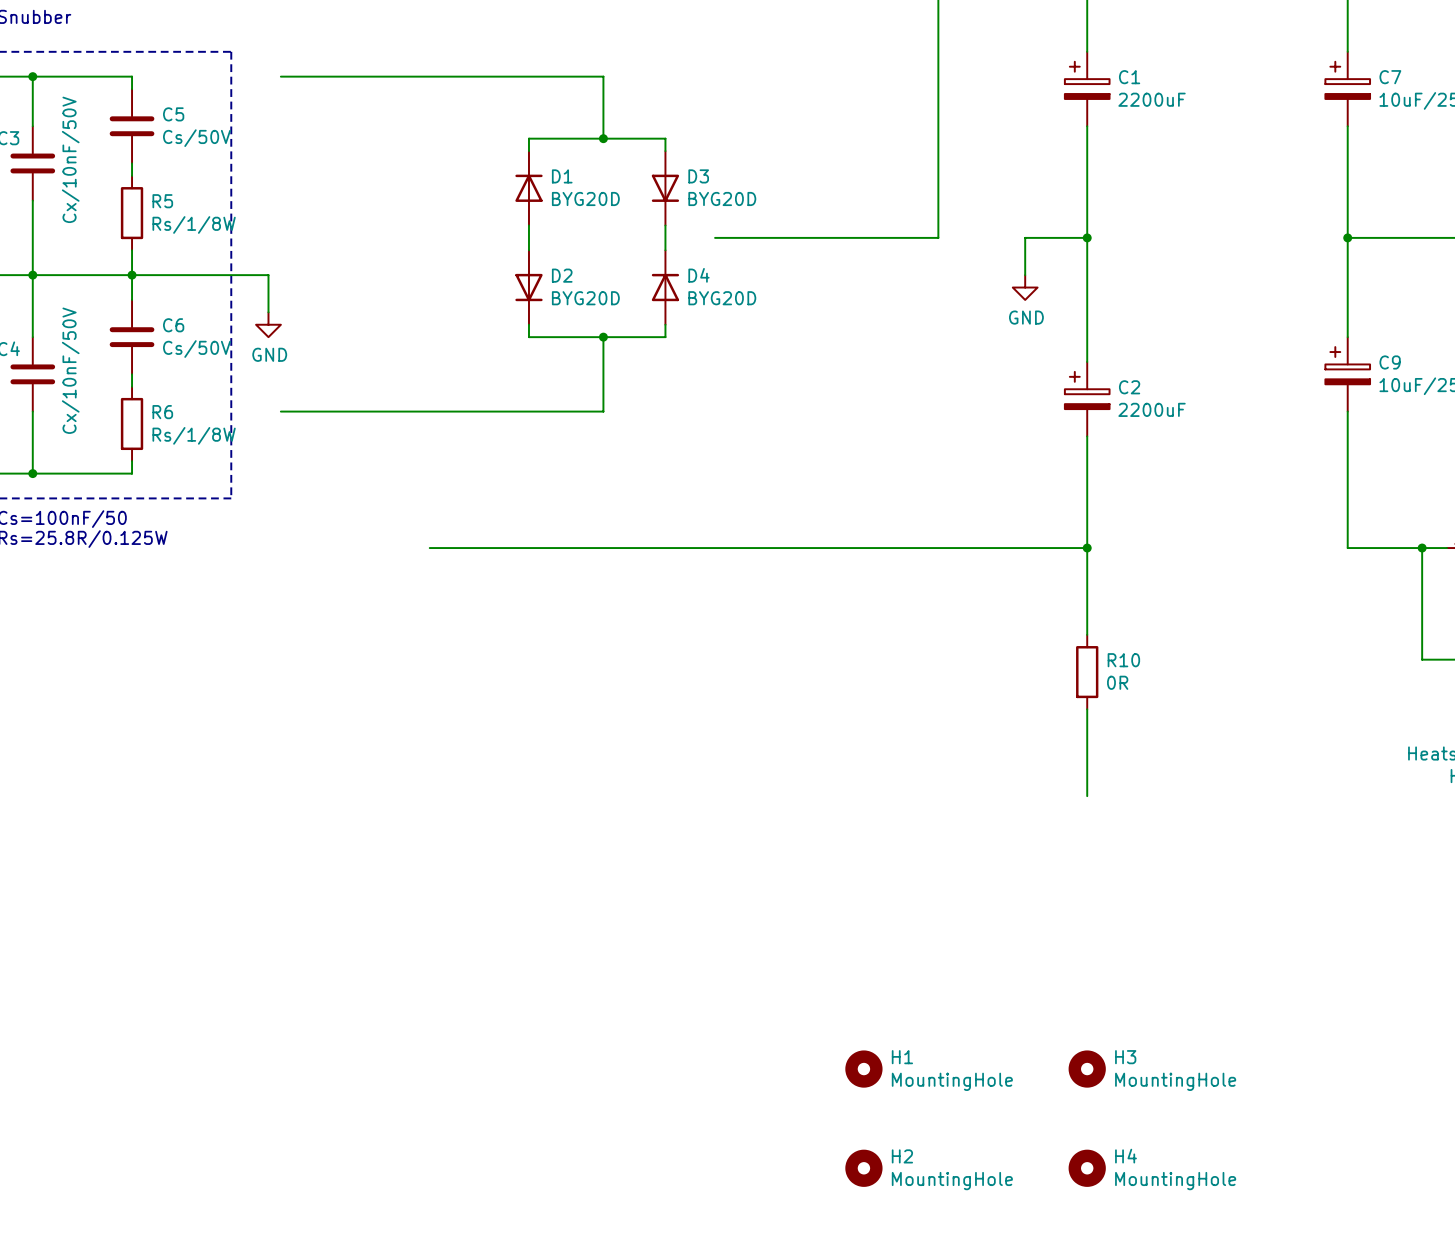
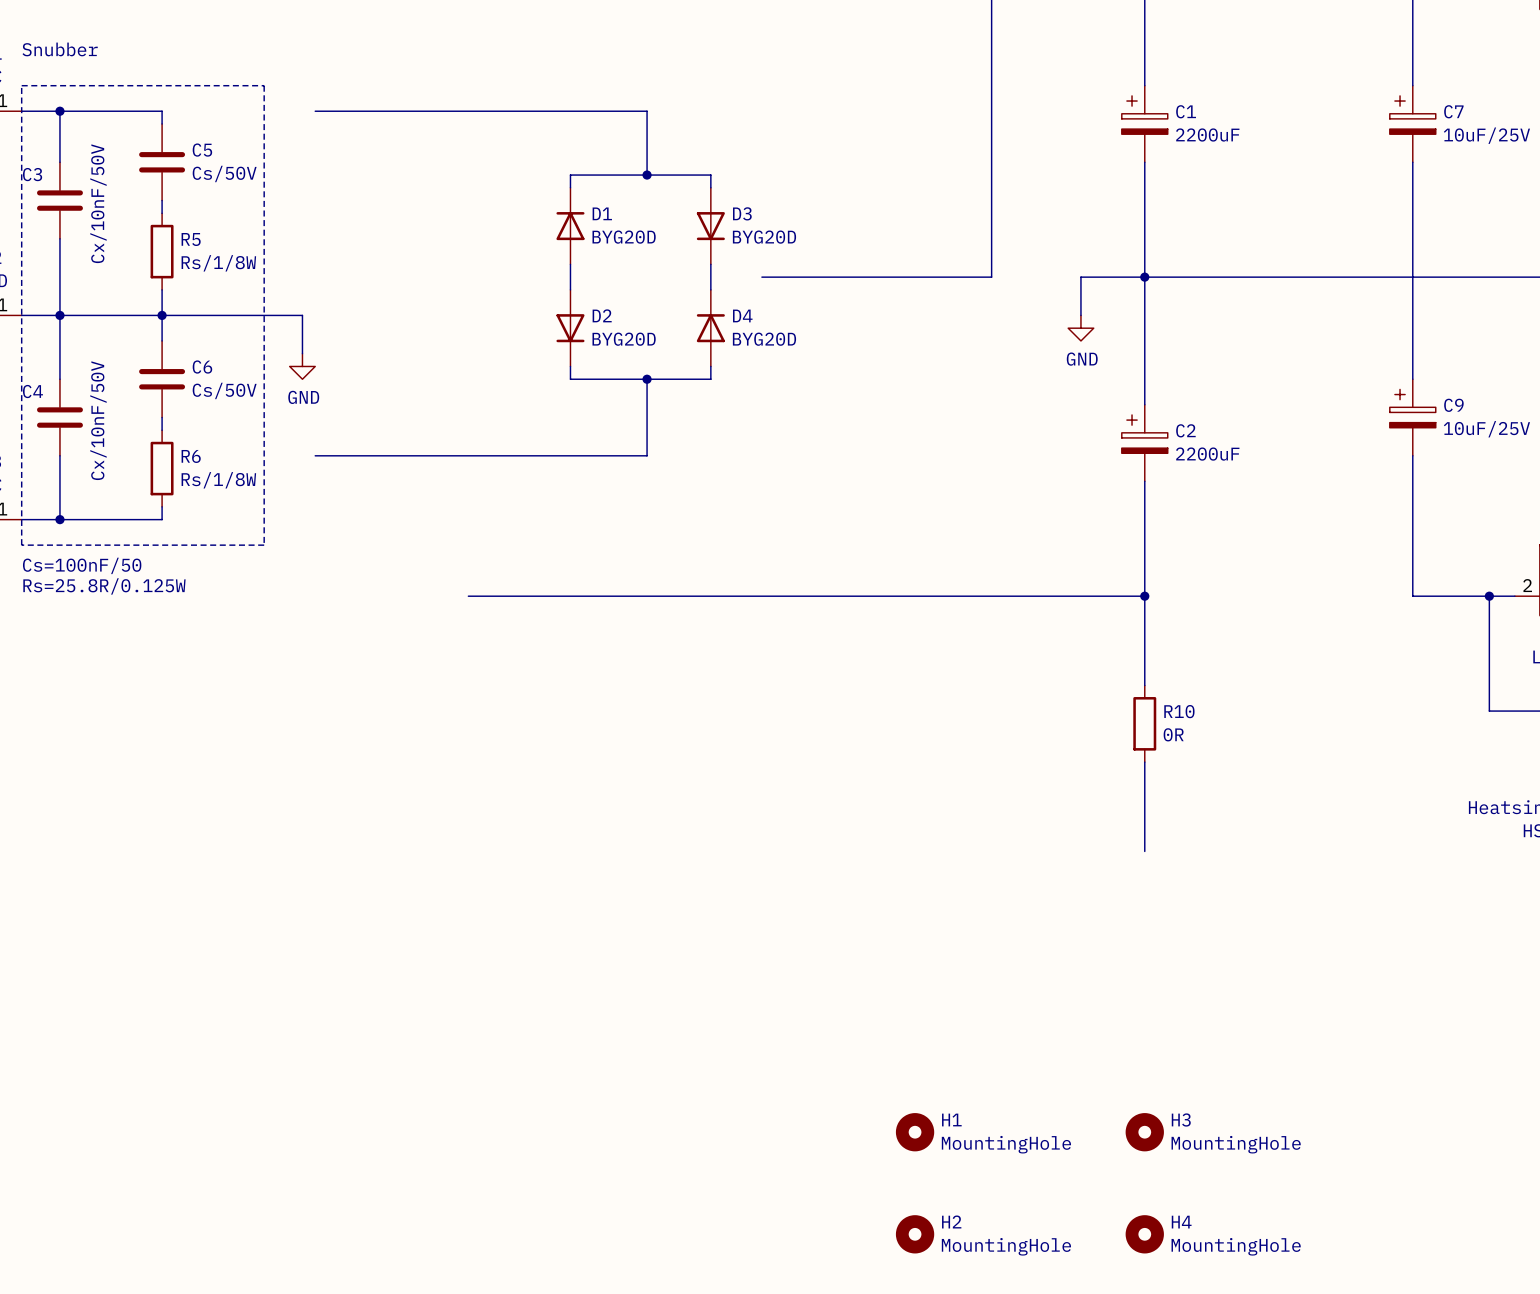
wire: none -> (1144, 277) (1412, 277)
junction: (1347, 237) -> none

